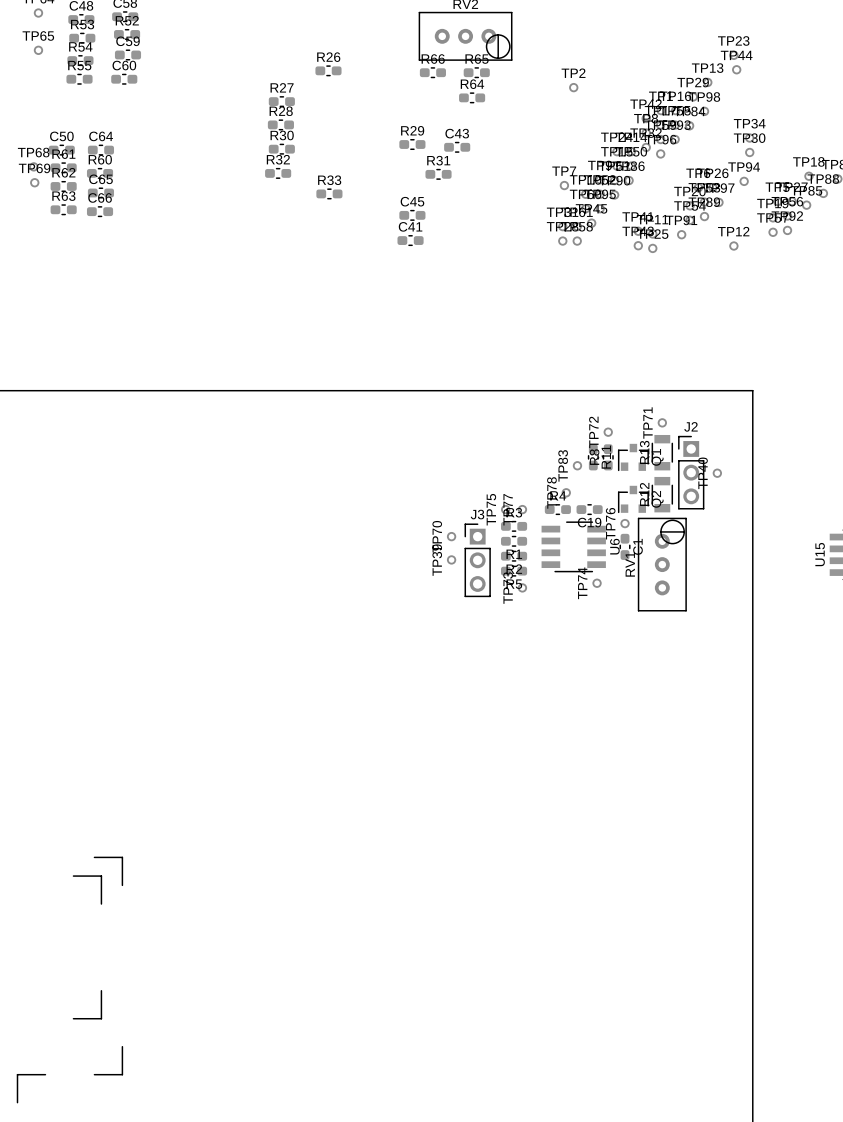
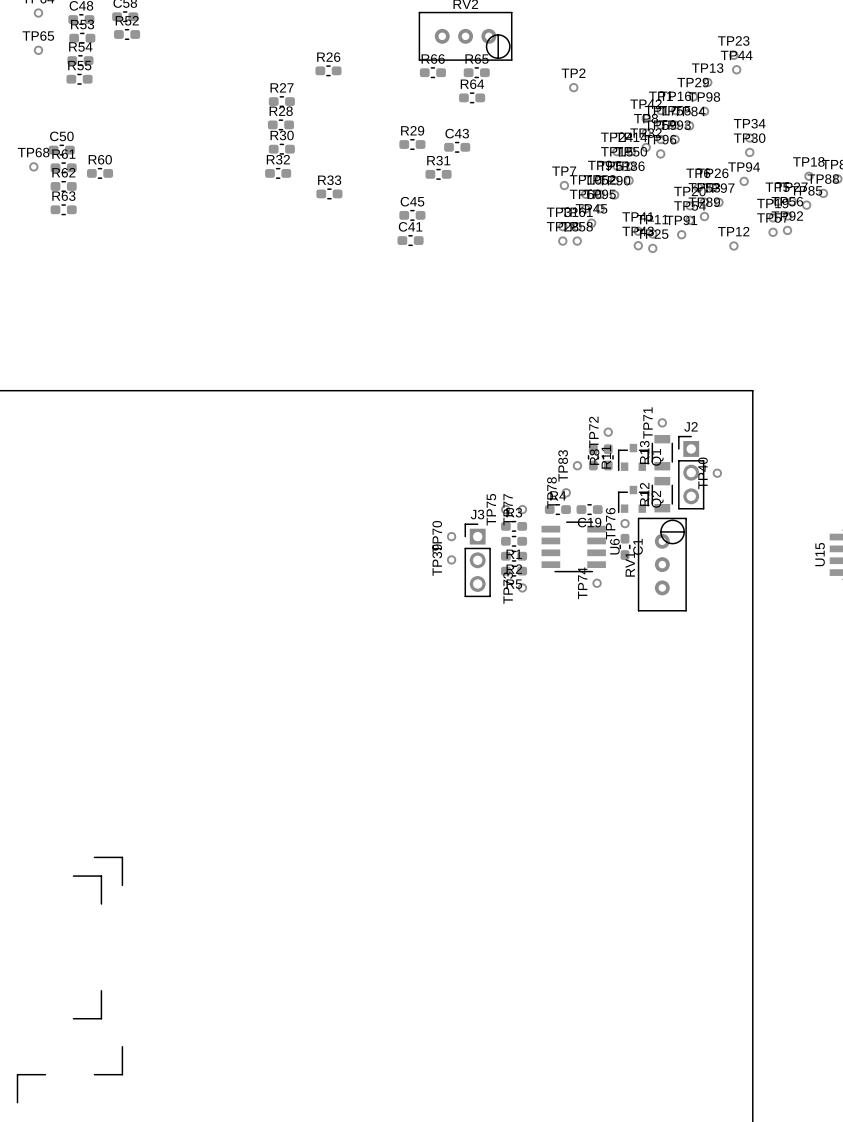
C59: (127, 54) -> none
C60: (124, 79) -> none
C64: (100, 150) -> none
TP69: (34, 182) -> none
C65: (100, 192) -> none
C66: (100, 211) -> none

